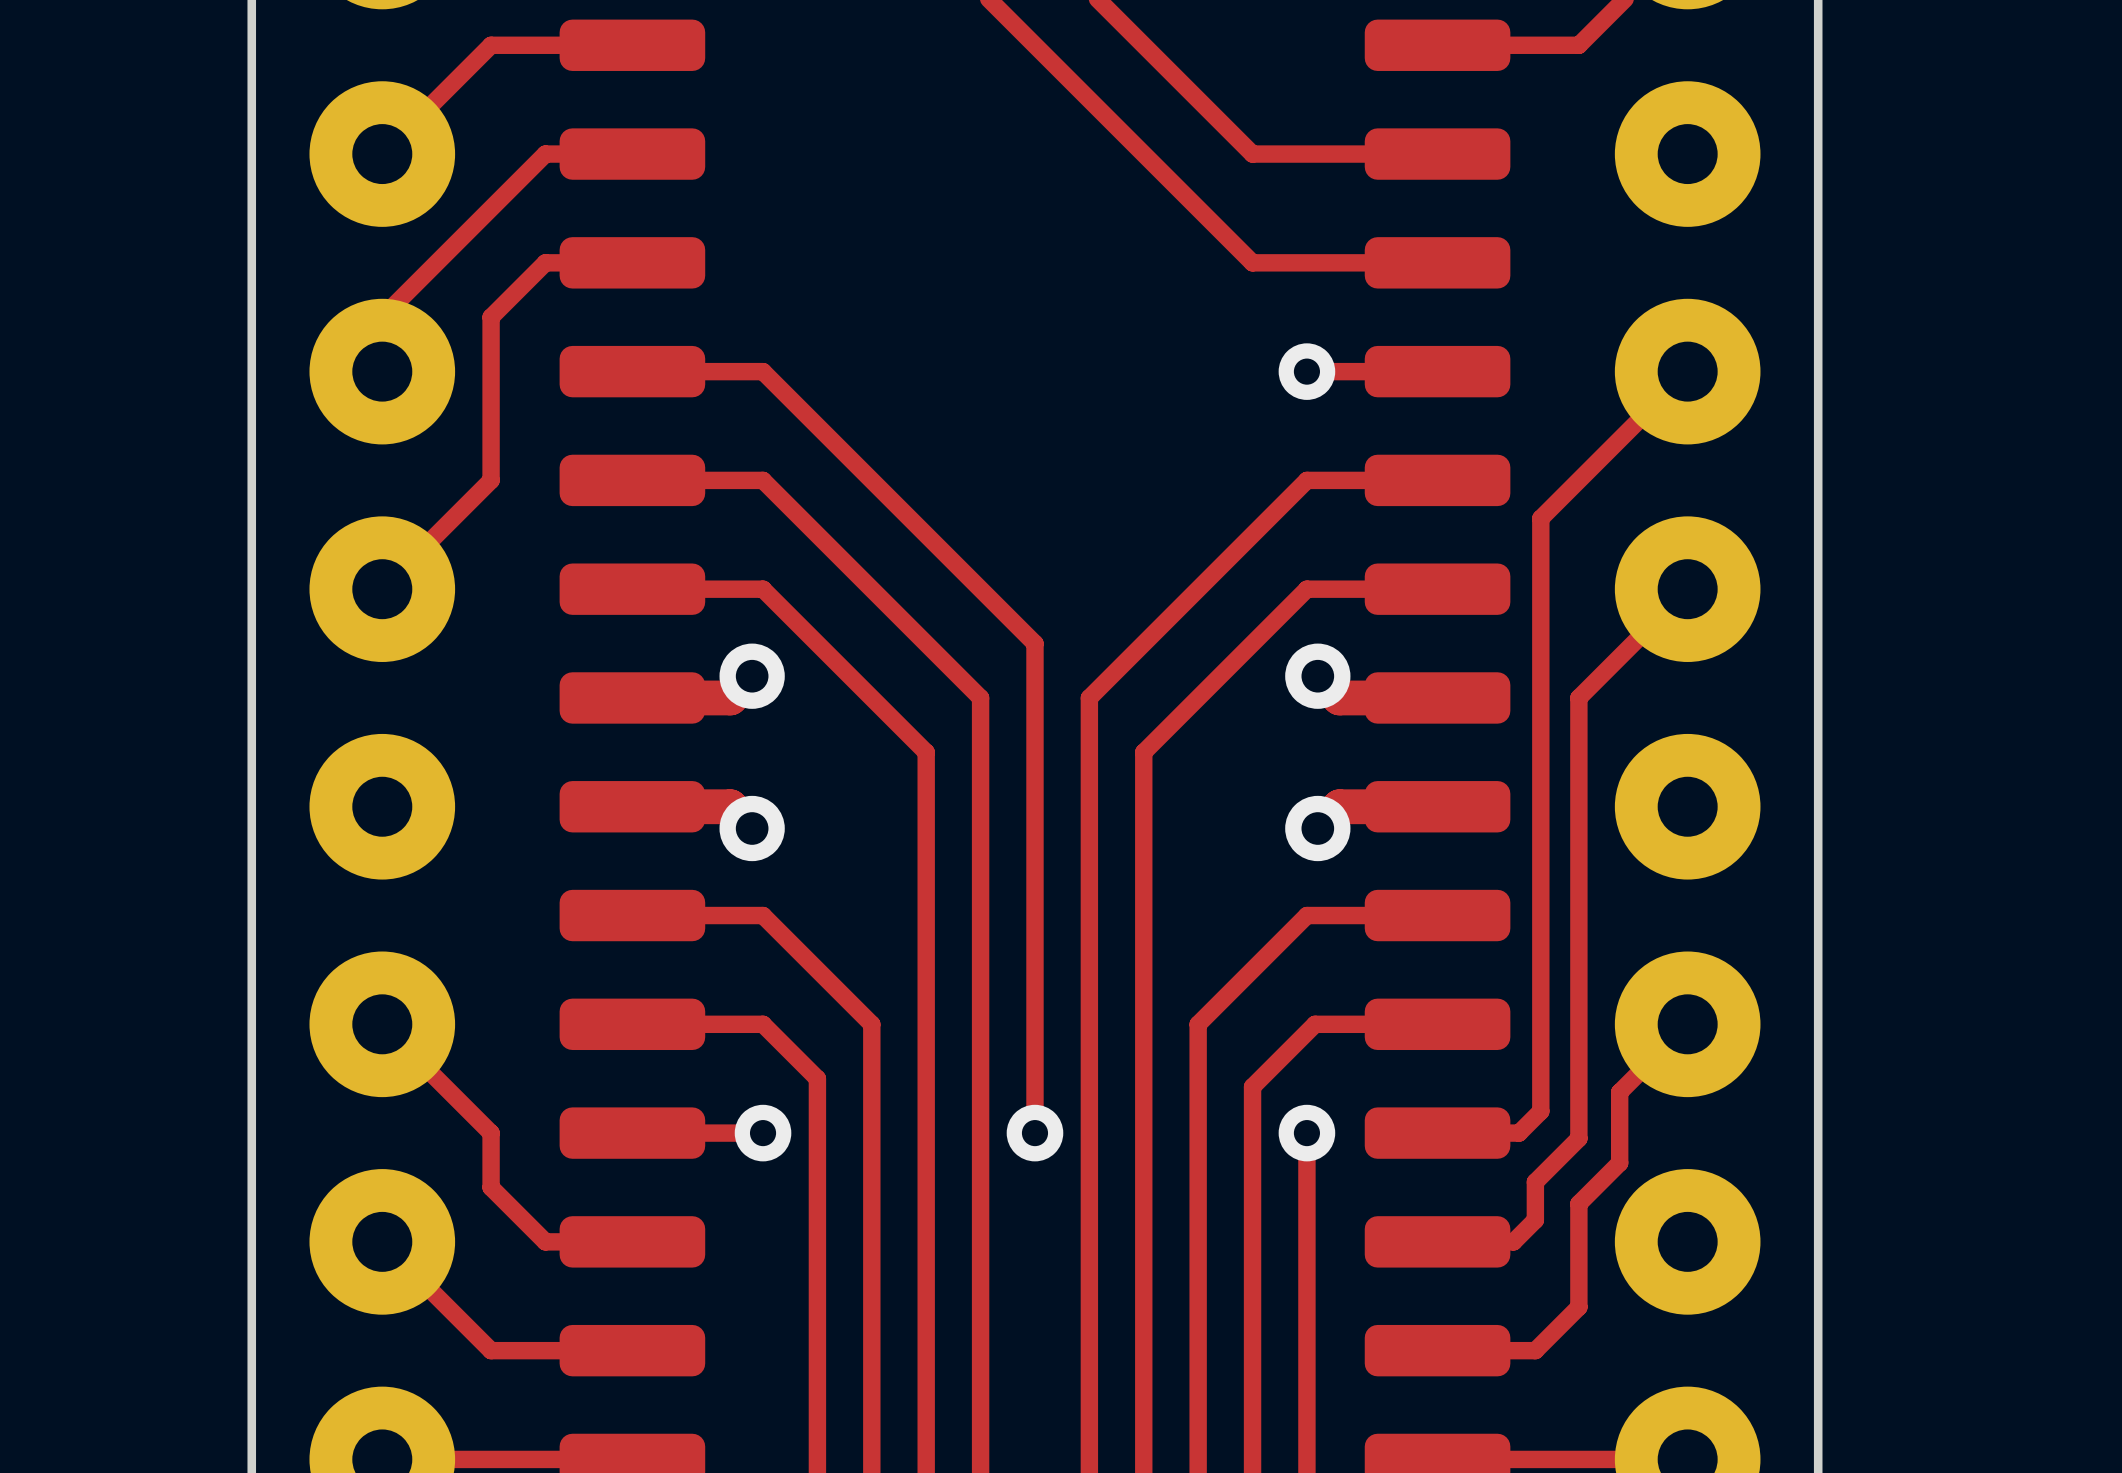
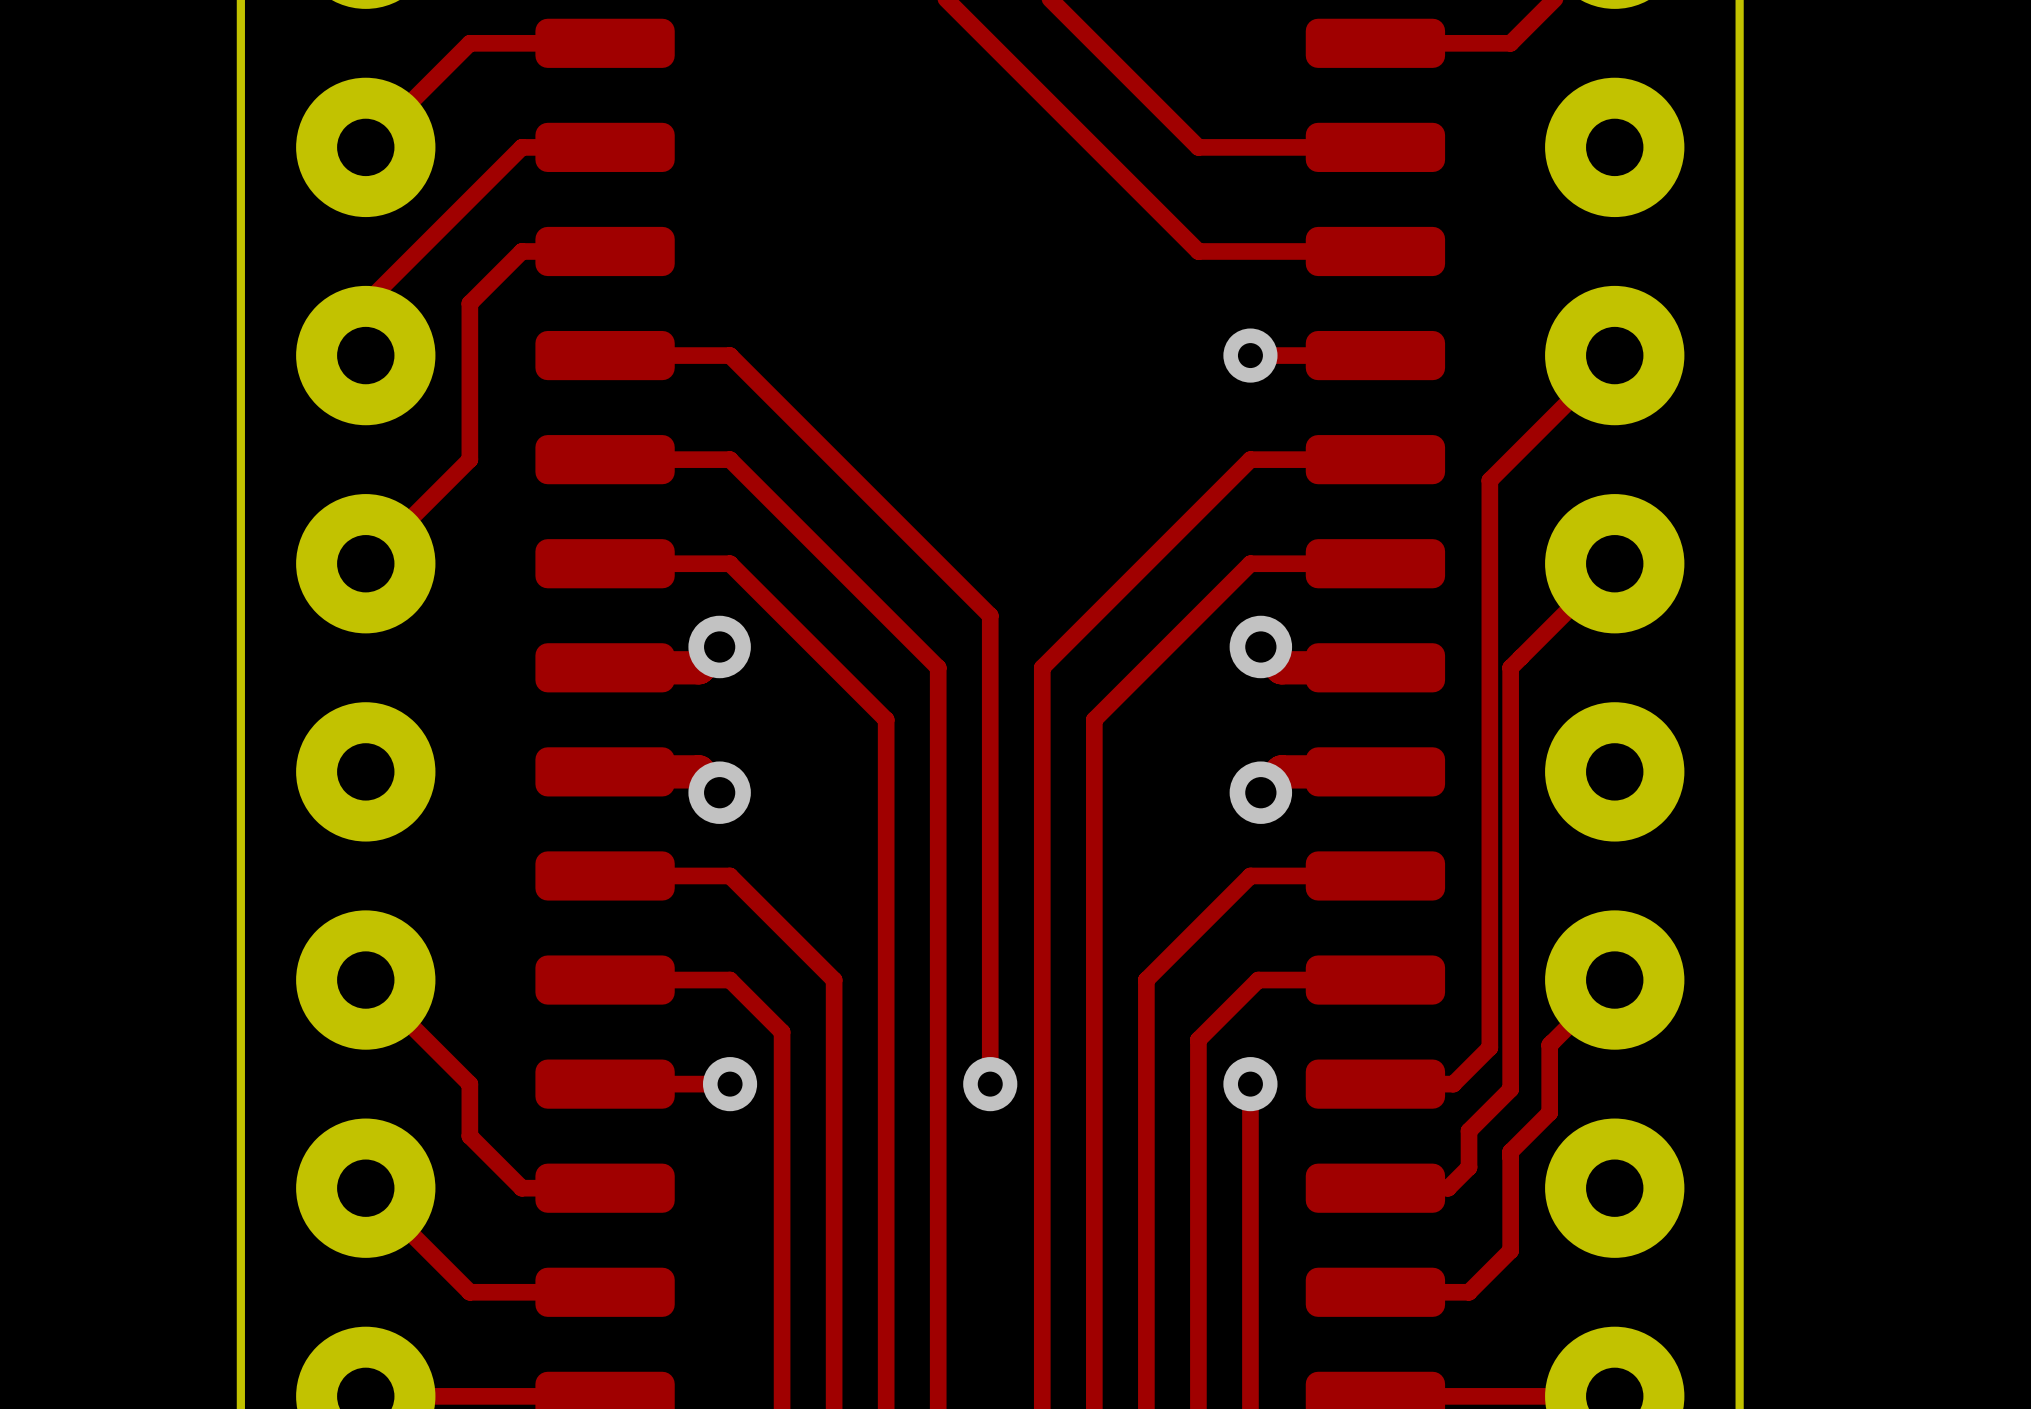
track: (1557, 502) (1540, 518) (1540, 1111) -> (1489, 480) (1489, 1047) (1474, 1063)

